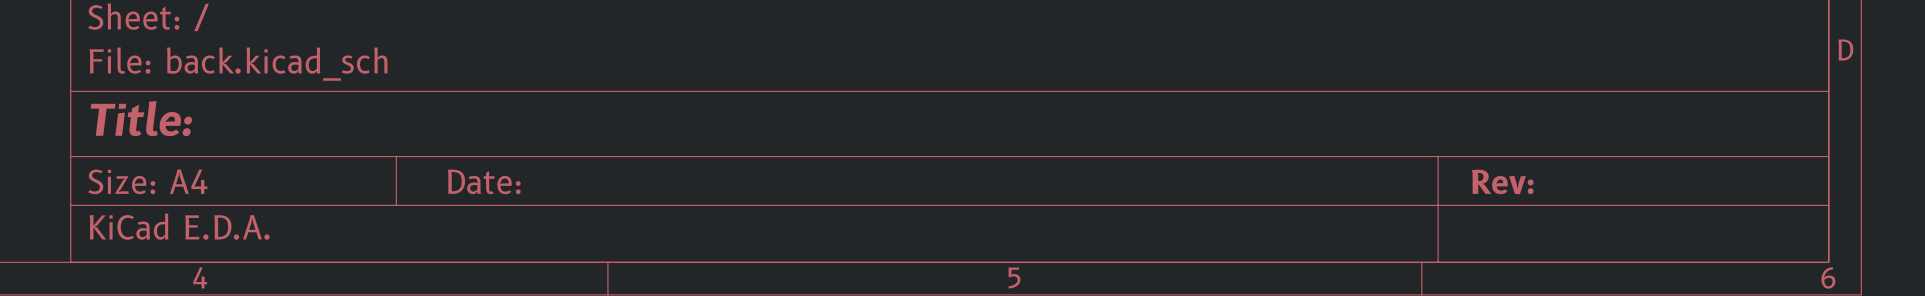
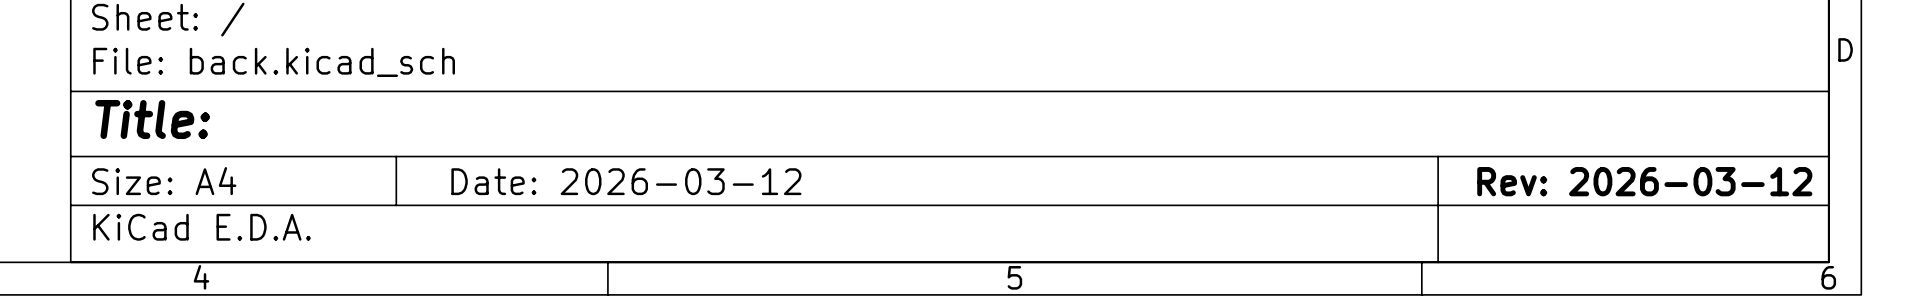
title block: Date: (484, 181) -> Date: 2026-03-12 (626, 181)
title block: Rev: (1502, 181) -> Rev: 2026-03-12 (1644, 181)

